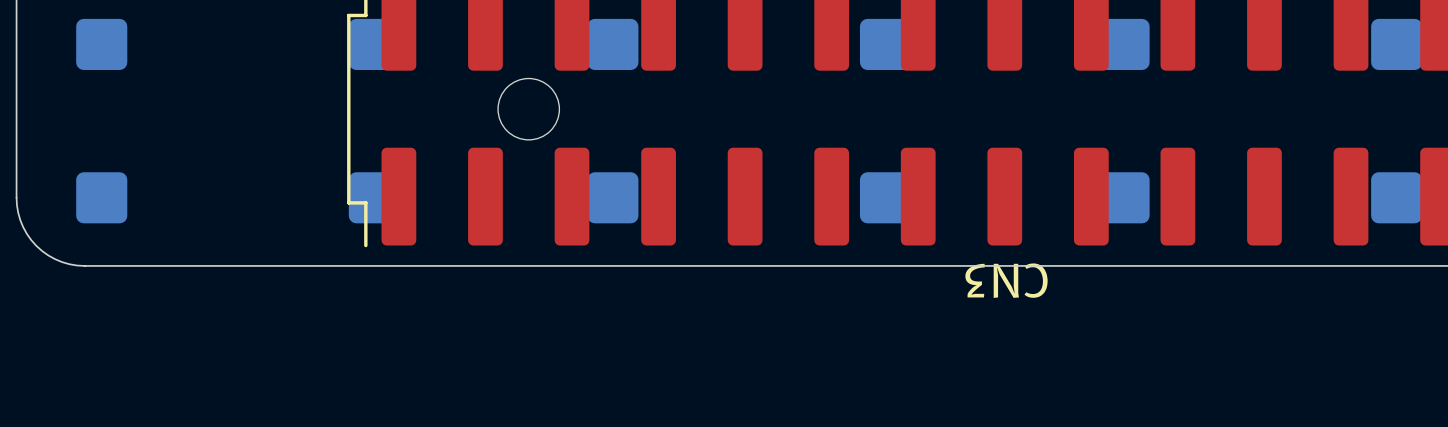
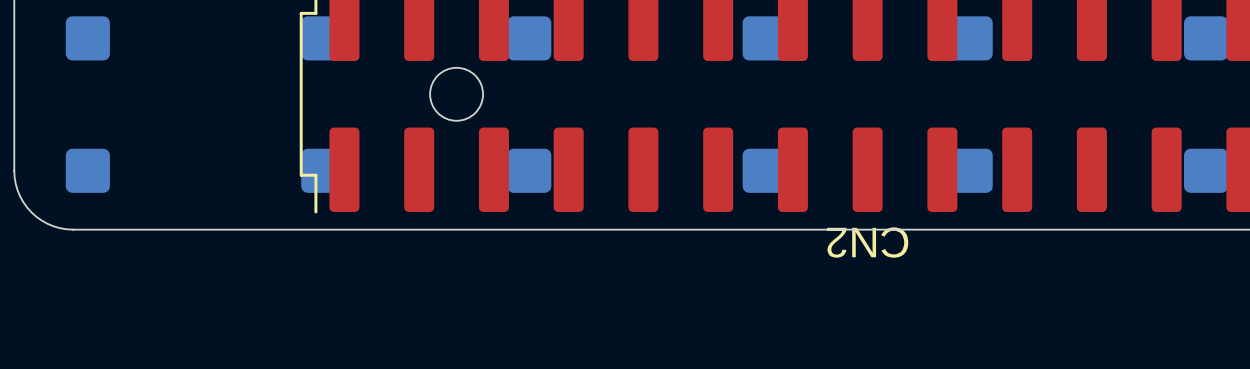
CN3 name: CN3 (1006, 280) -> CN2 (867, 242)

